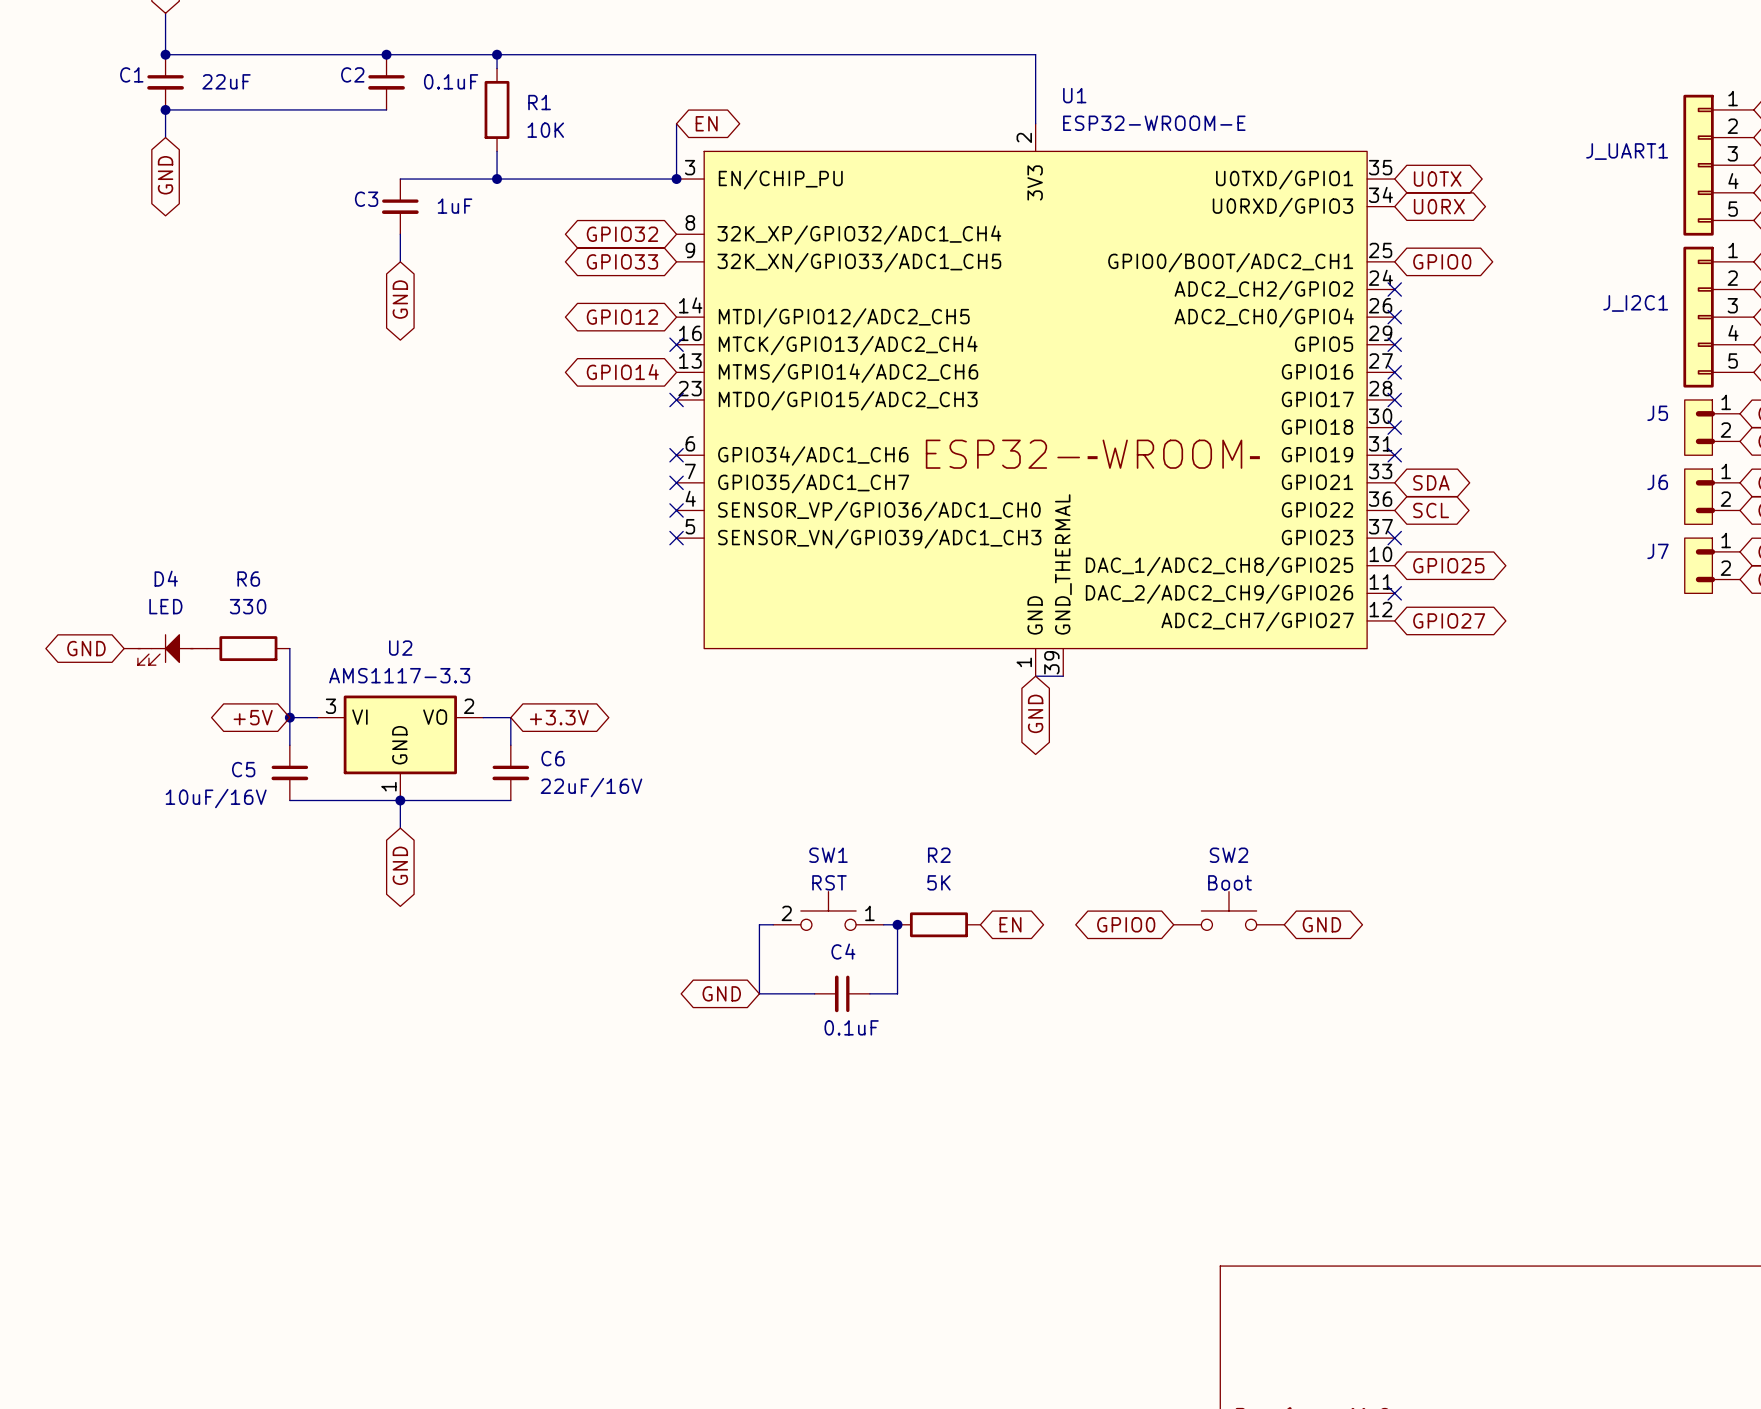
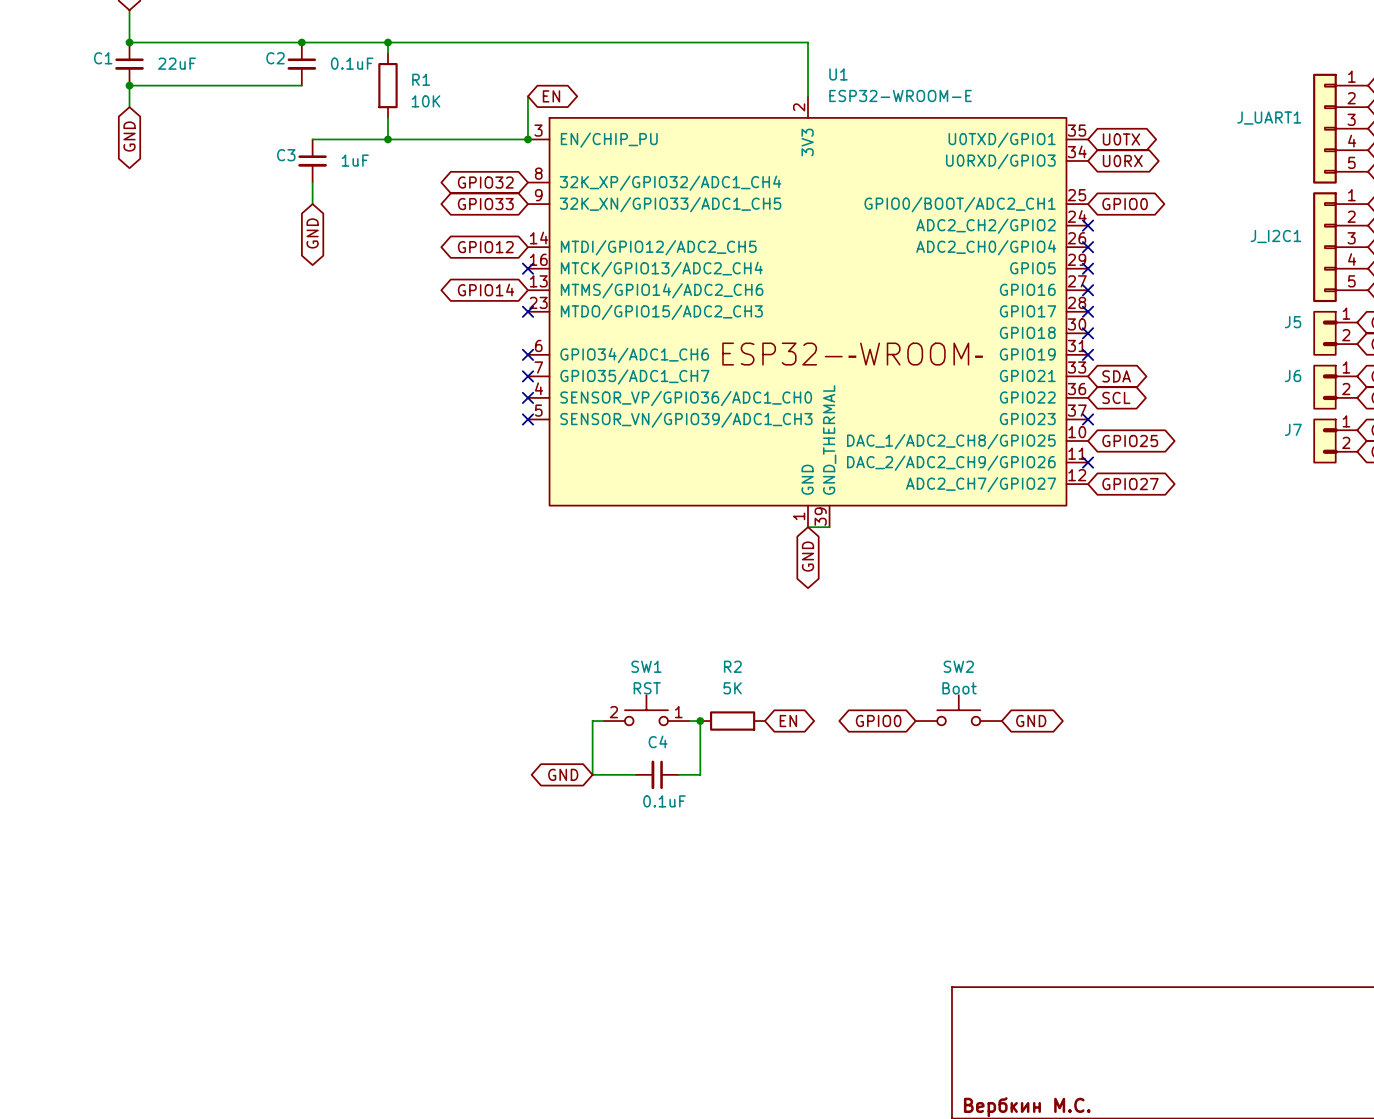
global label: GND (86, 648) -> none
R6: 330 (248, 648) -> none
wire: (289, 648) (289, 745) -> none
D4: LED (165, 649) -> none
global label: +5V (253, 717) -> none
wire: (289, 717) (317, 717) -> none
junction: (289, 717) -> none
wire: (483, 717) (510, 717) (510, 745) -> none
global label: +3.3V (559, 717) -> none
U2: AMS1117-3.3 (400, 748) -> none
C5: (289, 772) -> none
C6: (510, 772) -> none
wire: (289, 800) (510, 800) -> none
wire: (400, 800) (400, 828) -> none
junction: (400, 800) -> none
global label: GND (400, 865) -> none

